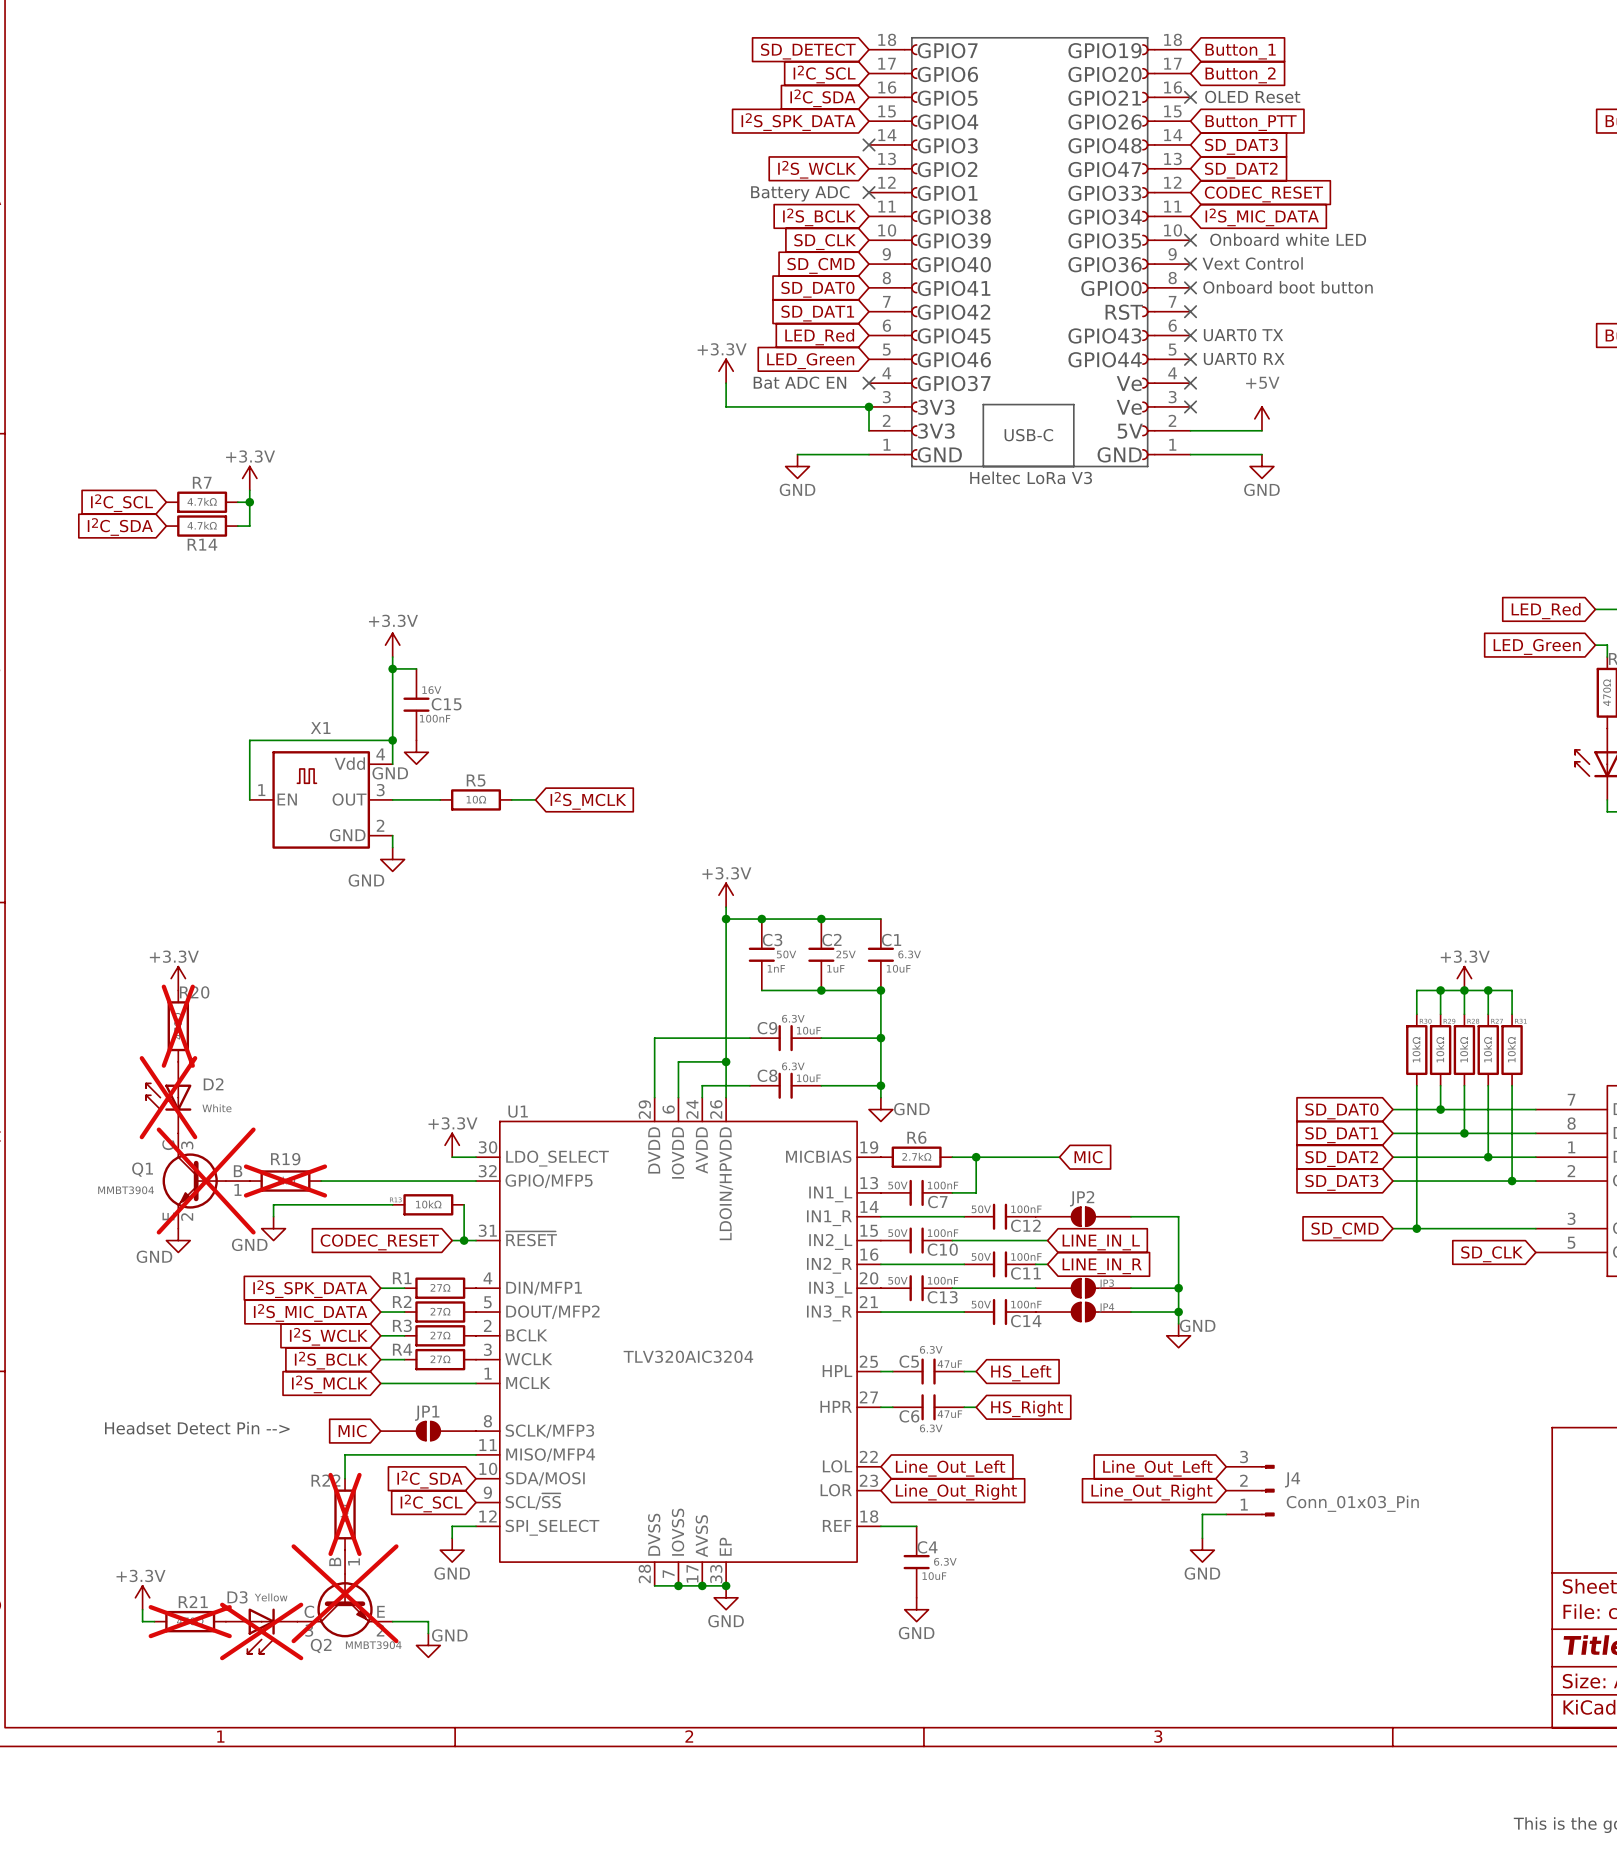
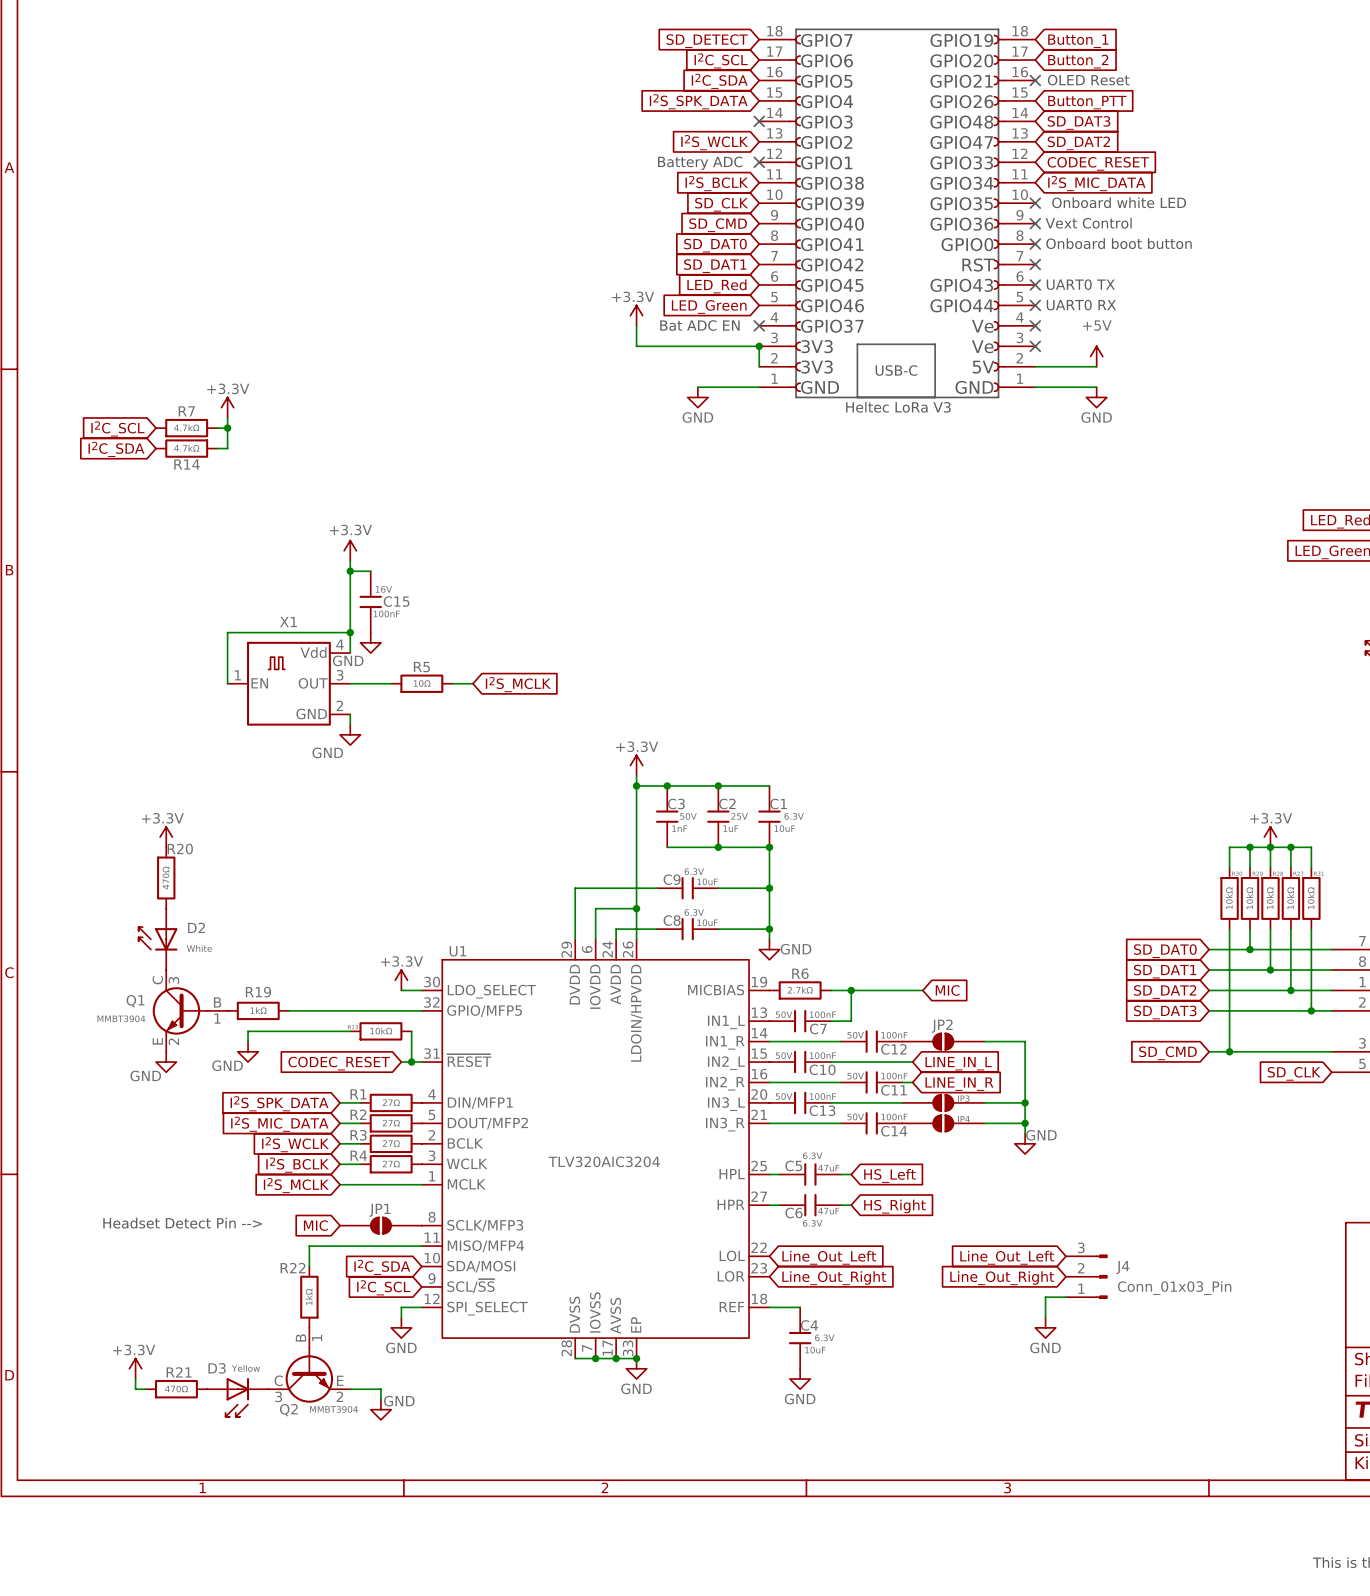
R20 do-not-place cross: (178, 1026) -> none
D2 do-not-place cross: (168, 1097) -> none
Q1 do-not-place cross: (206, 1181) -> none
R19 do-not-place cross: (285, 1181) -> none
R22 do-not-place cross: (345, 1514) -> none
Q2 do-not-place cross: (345, 1593) -> none
R21 do-not-place cross: (190, 1621) -> none
D3 do-not-place cross: (261, 1631) -> none

